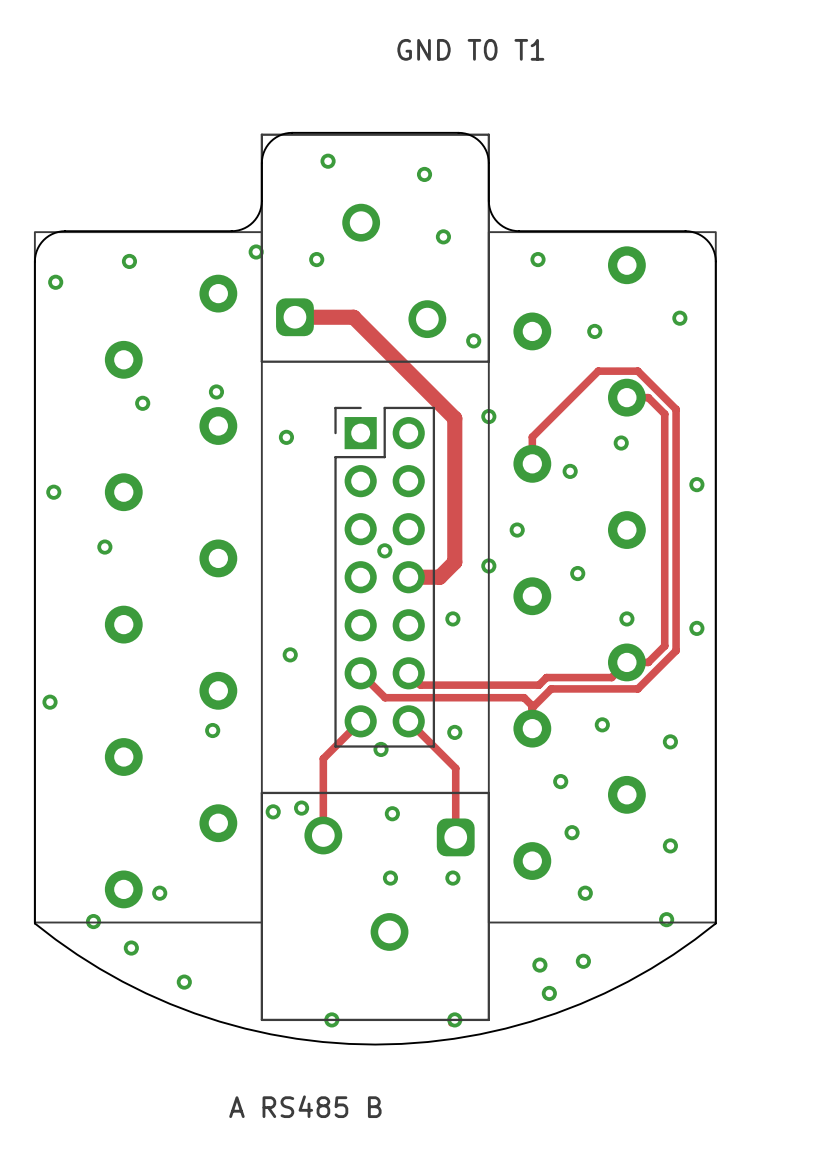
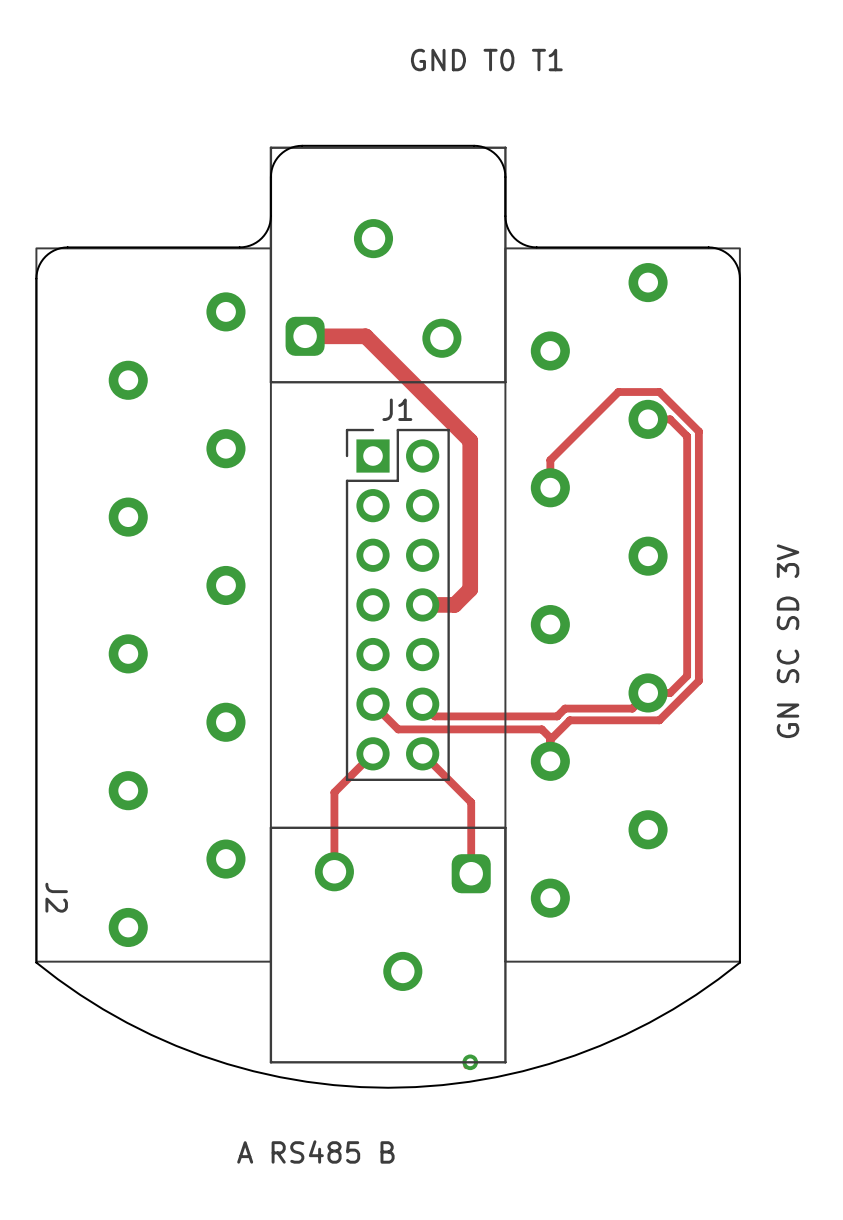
via: (328, 161) -> none
via: (424, 174) -> none
via: (443, 236) -> none
via: (256, 251) -> none
via: (316, 259) -> none
via: (538, 259) -> none
via: (129, 261) -> none
via: (55, 282) -> none
via: (679, 318) -> none
via: (594, 331) -> none
via: (473, 340) -> none
J1 name: none -> J1 (397, 409)
via: (216, 391) -> none
via: (142, 403) -> none
via: (488, 416) -> none
via: (286, 437) -> none
via: (621, 443) -> none
via: (570, 471) -> none
via: (696, 484) -> none
via: (53, 492) -> none
via: (517, 530) -> none
via: (104, 547) -> none
via: (384, 550) -> none
via: (488, 565) -> none
via: (577, 573) -> none
text: none -> GN SC SD 3V (788, 641)
via: (452, 618) -> none
via: (626, 618) -> none
via: (696, 628) -> none
via: (290, 654) -> none
via: (50, 702) -> none
via: (602, 724) -> none
via: (212, 730) -> none
via: (454, 732) -> none
via: (670, 741) -> none
via: (381, 749) -> none
via: (560, 781) -> none
via: (301, 808) -> none
via: (273, 811) -> none
via: (392, 813) -> none
via: (572, 832) -> none
via: (670, 845) -> none
J2 name: none -> J2 (56, 897)
via: (390, 878) -> none
via: (452, 878) -> none
via: (159, 893) -> none
via: (585, 893) -> none
via: (666, 919) -> none
via: (93, 921) -> none
via: (131, 948) -> none
via: (583, 961) -> none
via: (539, 965) -> none
via: (184, 982) -> none
via: (549, 993) -> none
via: (331, 1019) -> none

